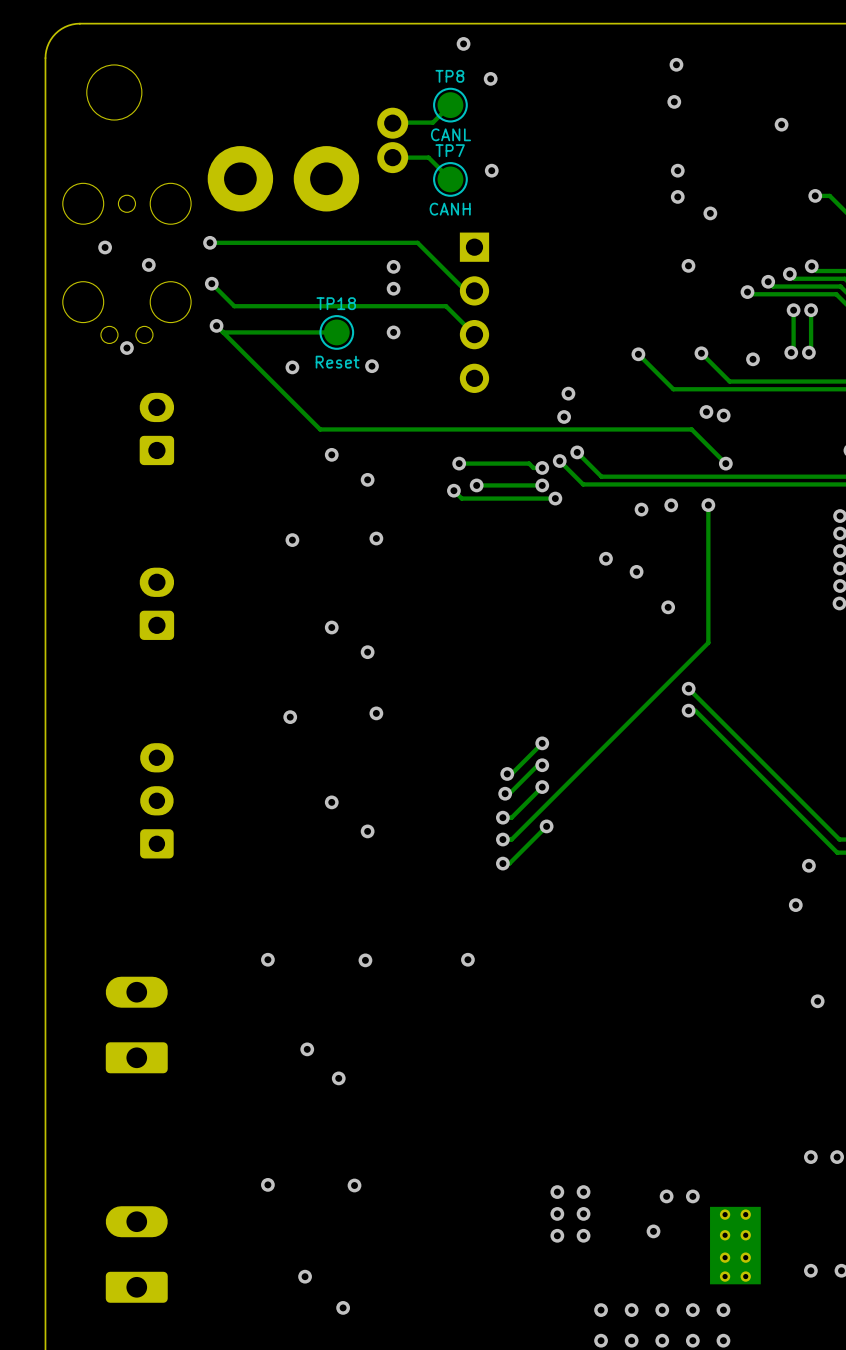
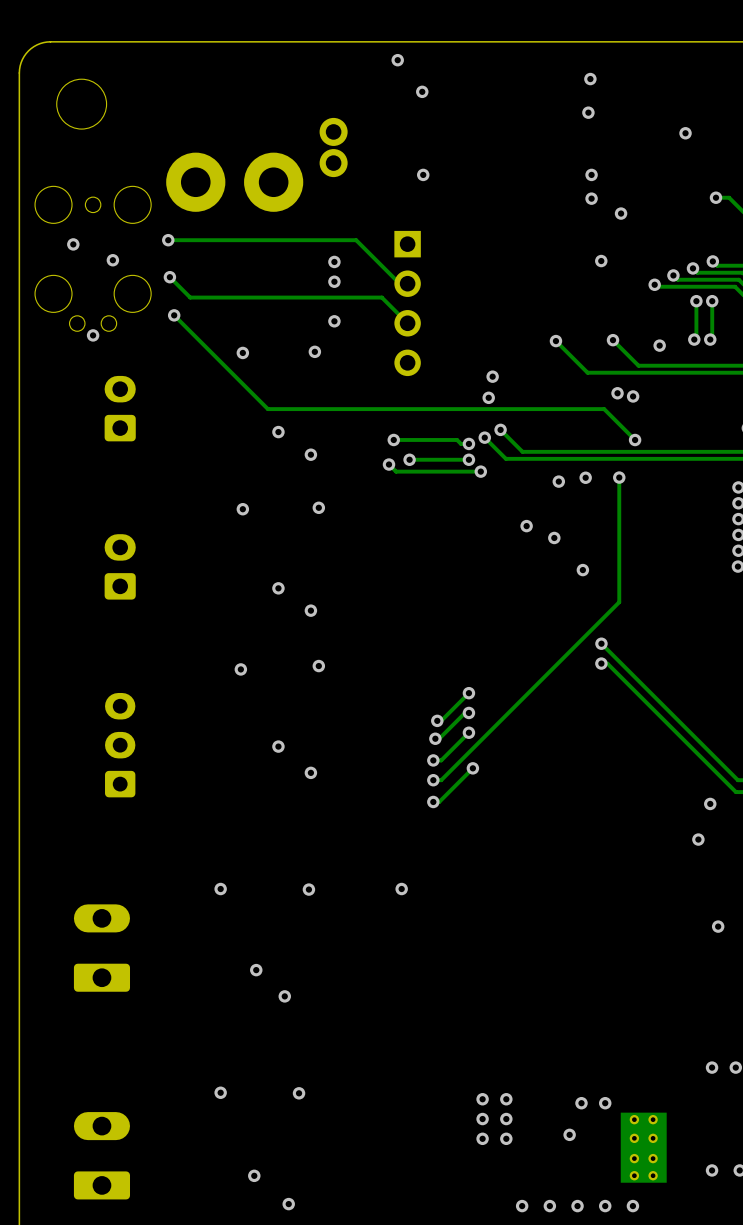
track: (450, 105) (432, 122) (392, 123) -> none
TP8: CANL (450, 105) -> none
track: (392, 157) (428, 157) (450, 179) -> none
TP7: CANH (450, 179) -> none
track: (336, 332) (223, 332) -> none
TP18: Reset (336, 332) -> none

